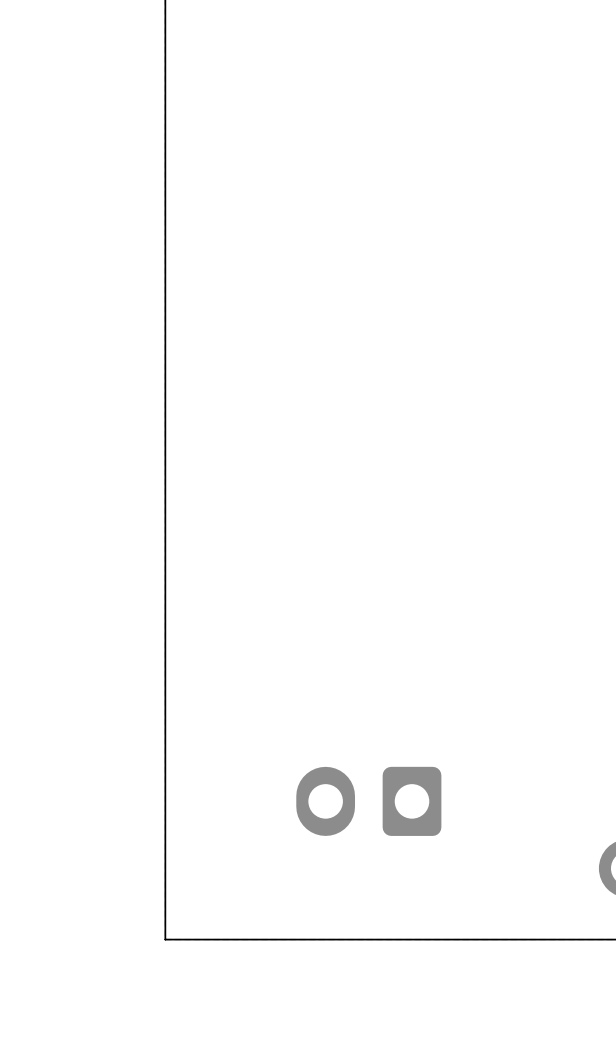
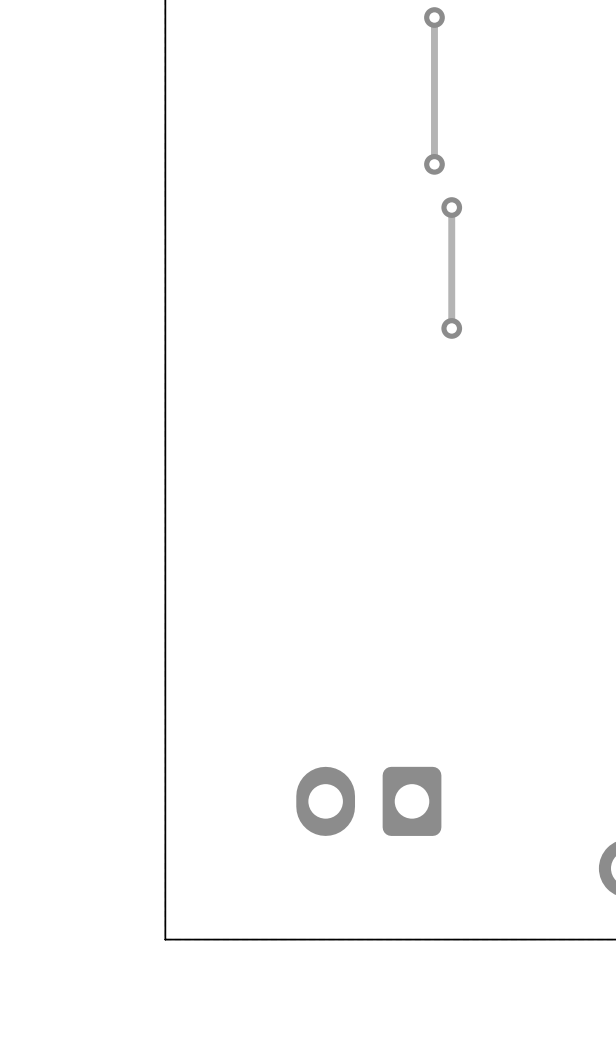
track: none -> (434, 17) (434, 164)
via: none -> (434, 17)
via: none -> (434, 164)
track: none -> (451, 207) (451, 328)
via: none -> (451, 207)
via: none -> (451, 328)

